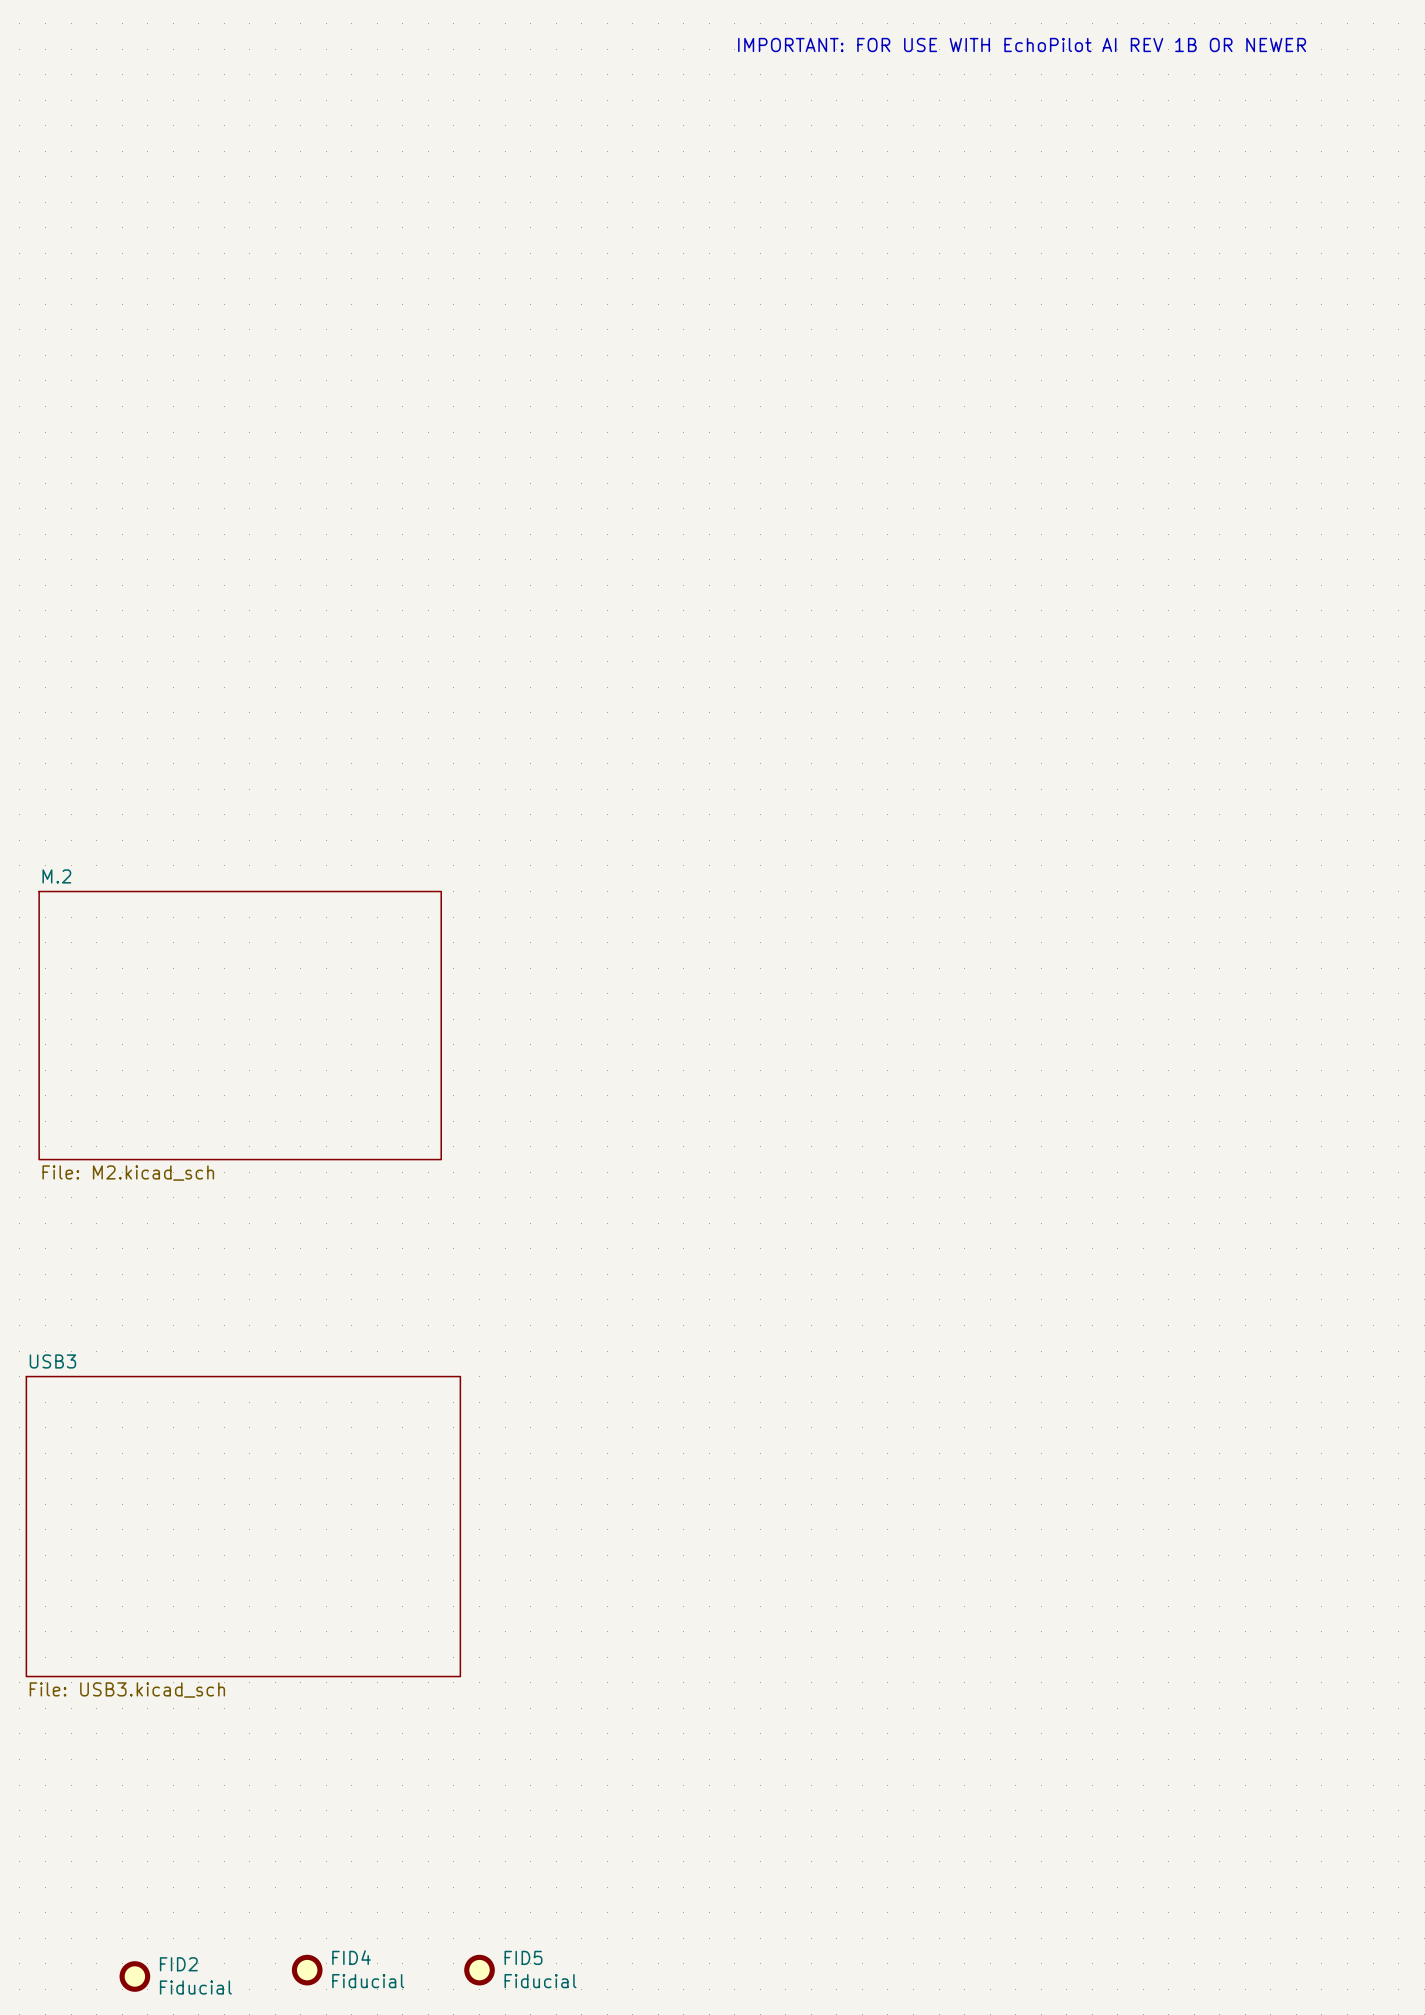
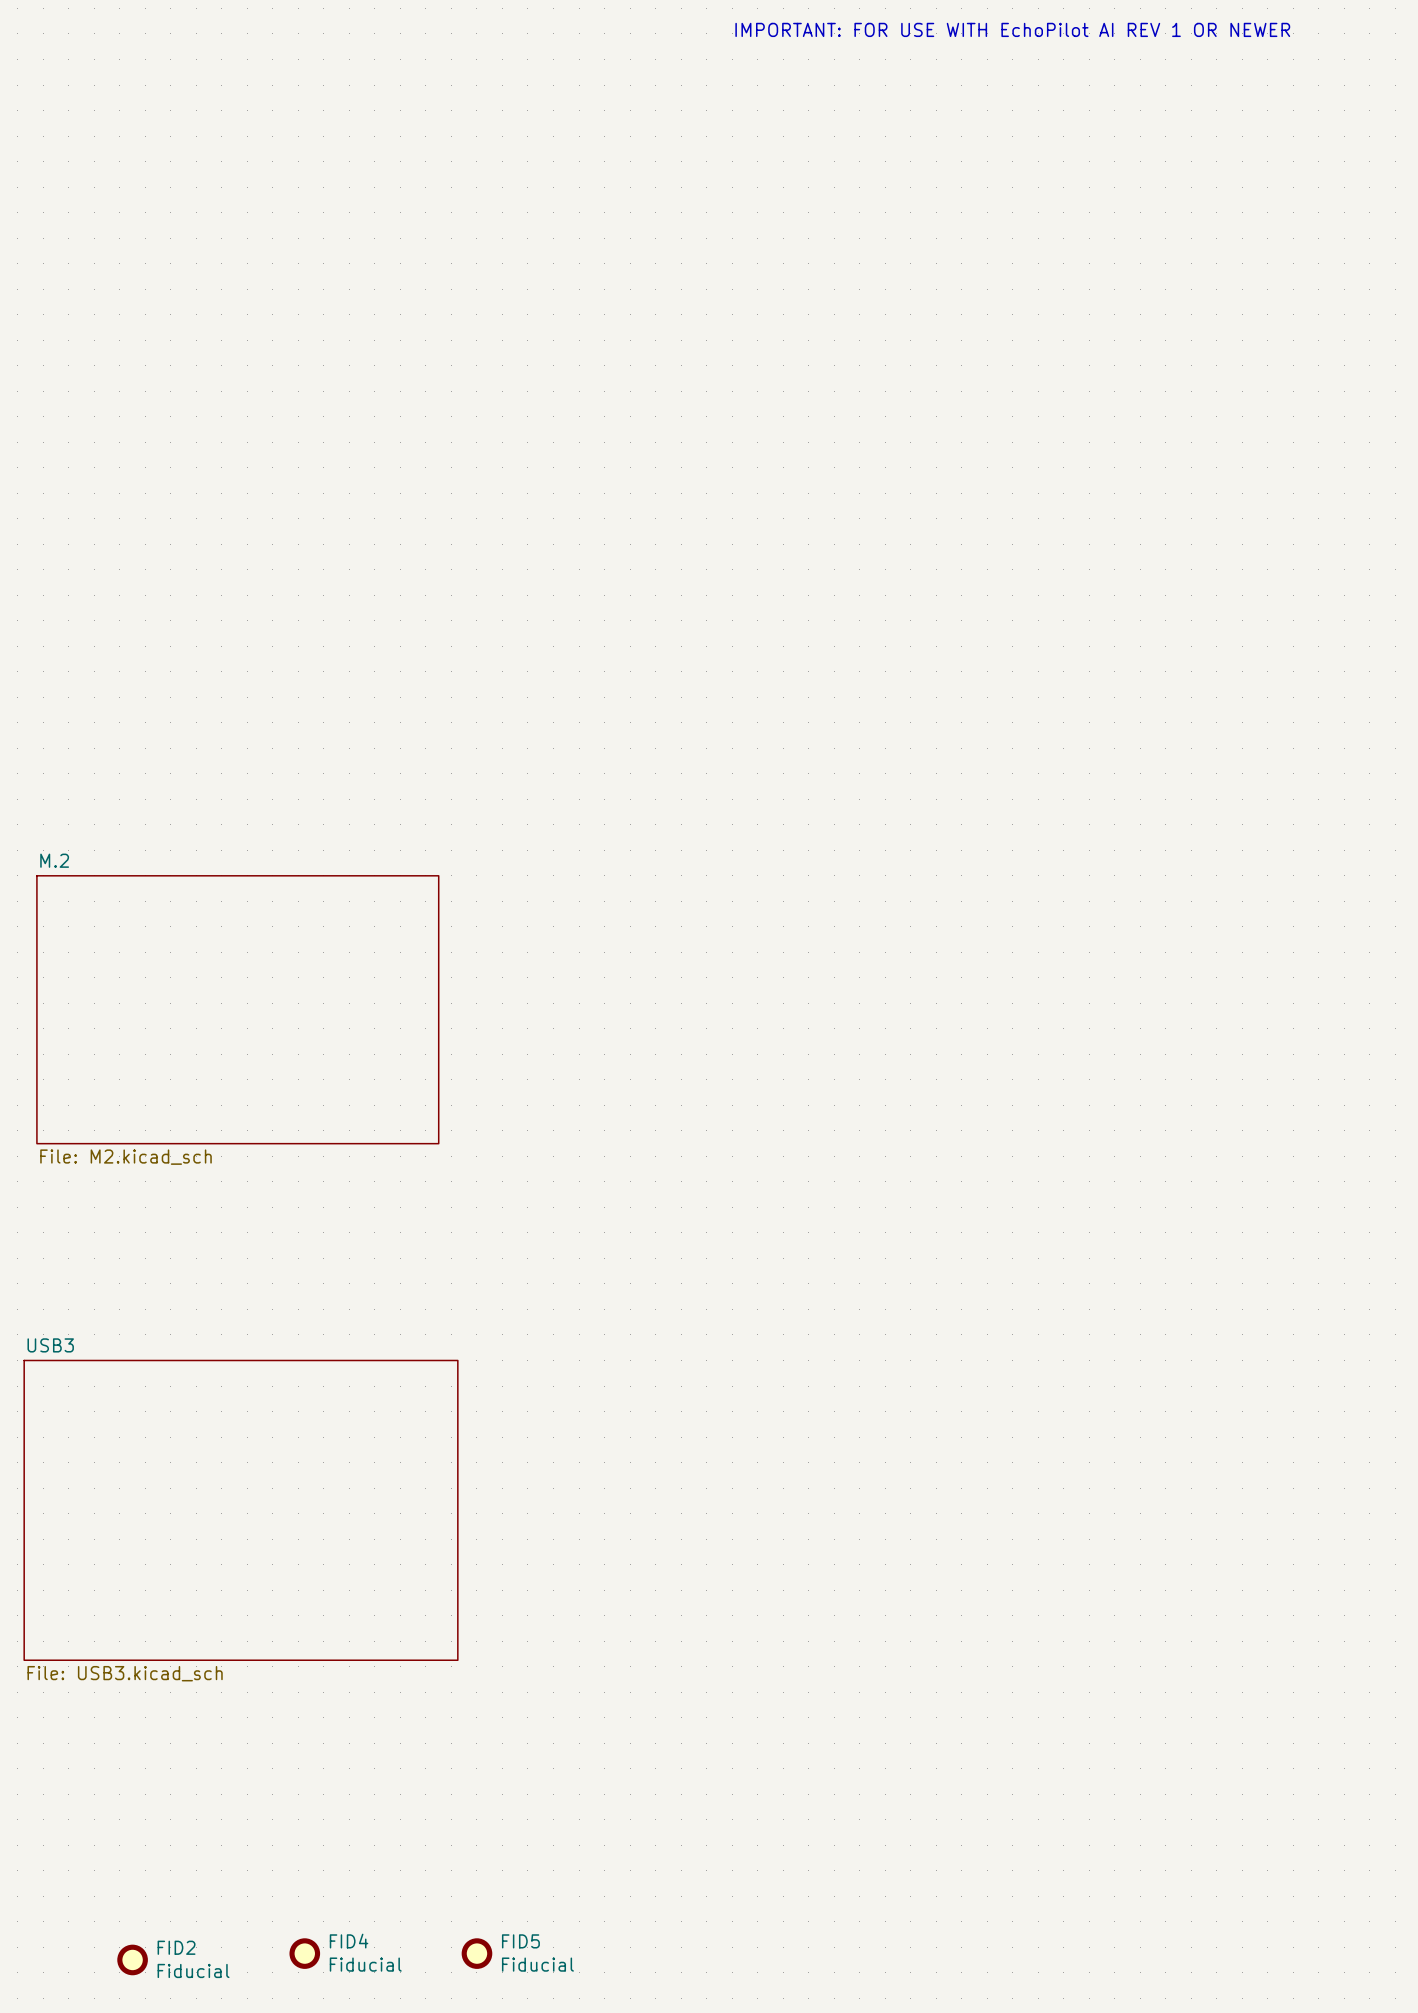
text: IMPORTANT: FOR USE WITH EchoPilot AI REV 1B OR NEWER (1022, 44) -> IMPORTANT: FOR USE WITH EchoPilot AI REV 1 OR NEWER (1012, 29)

